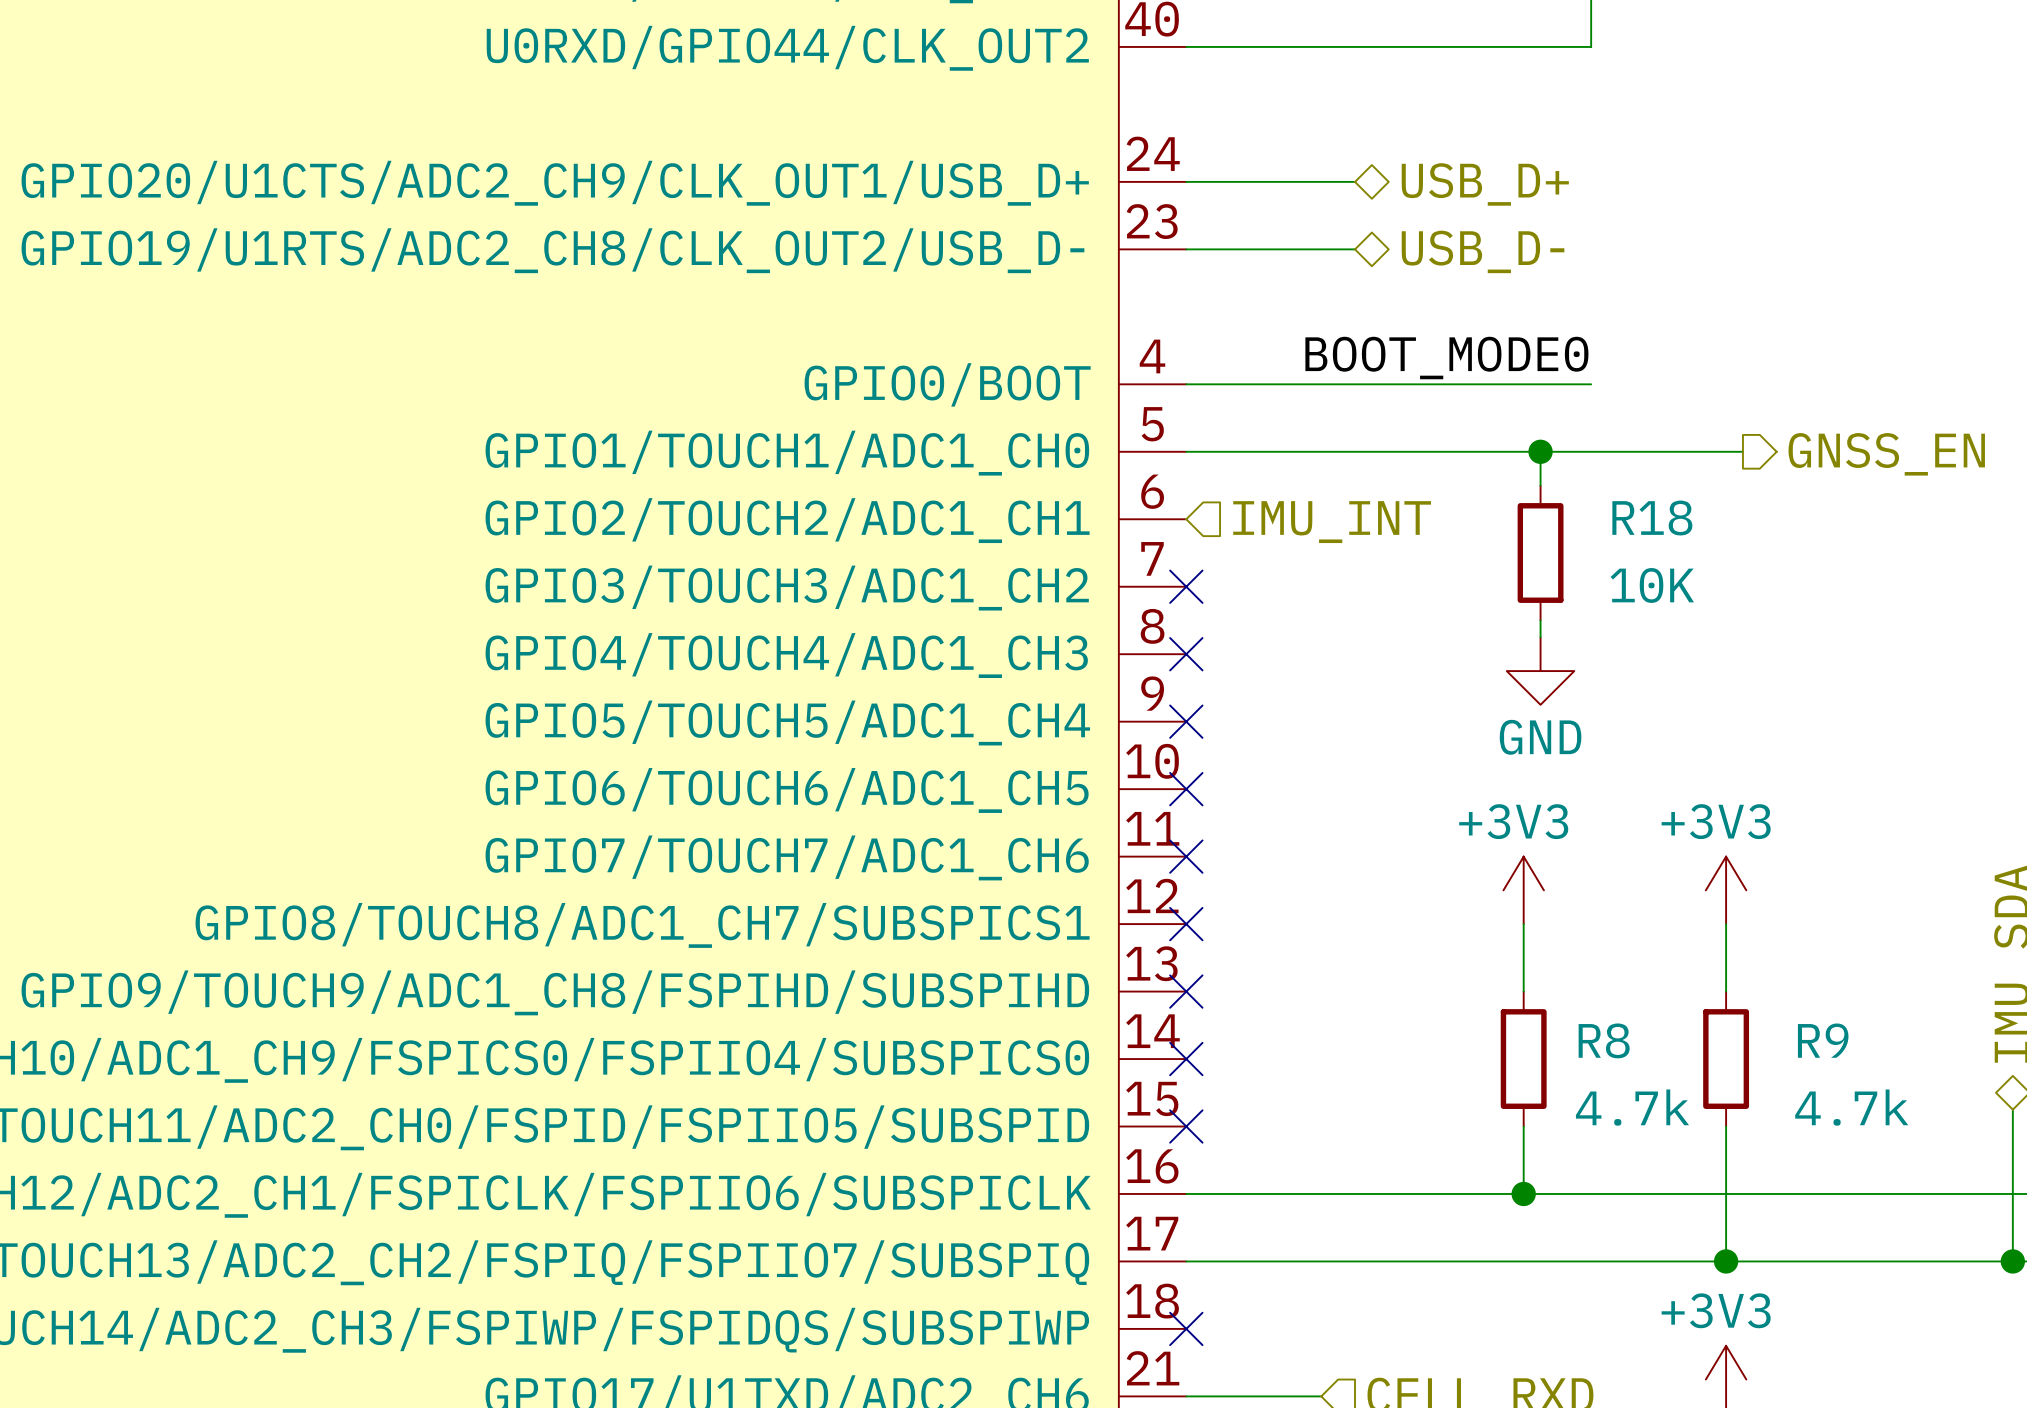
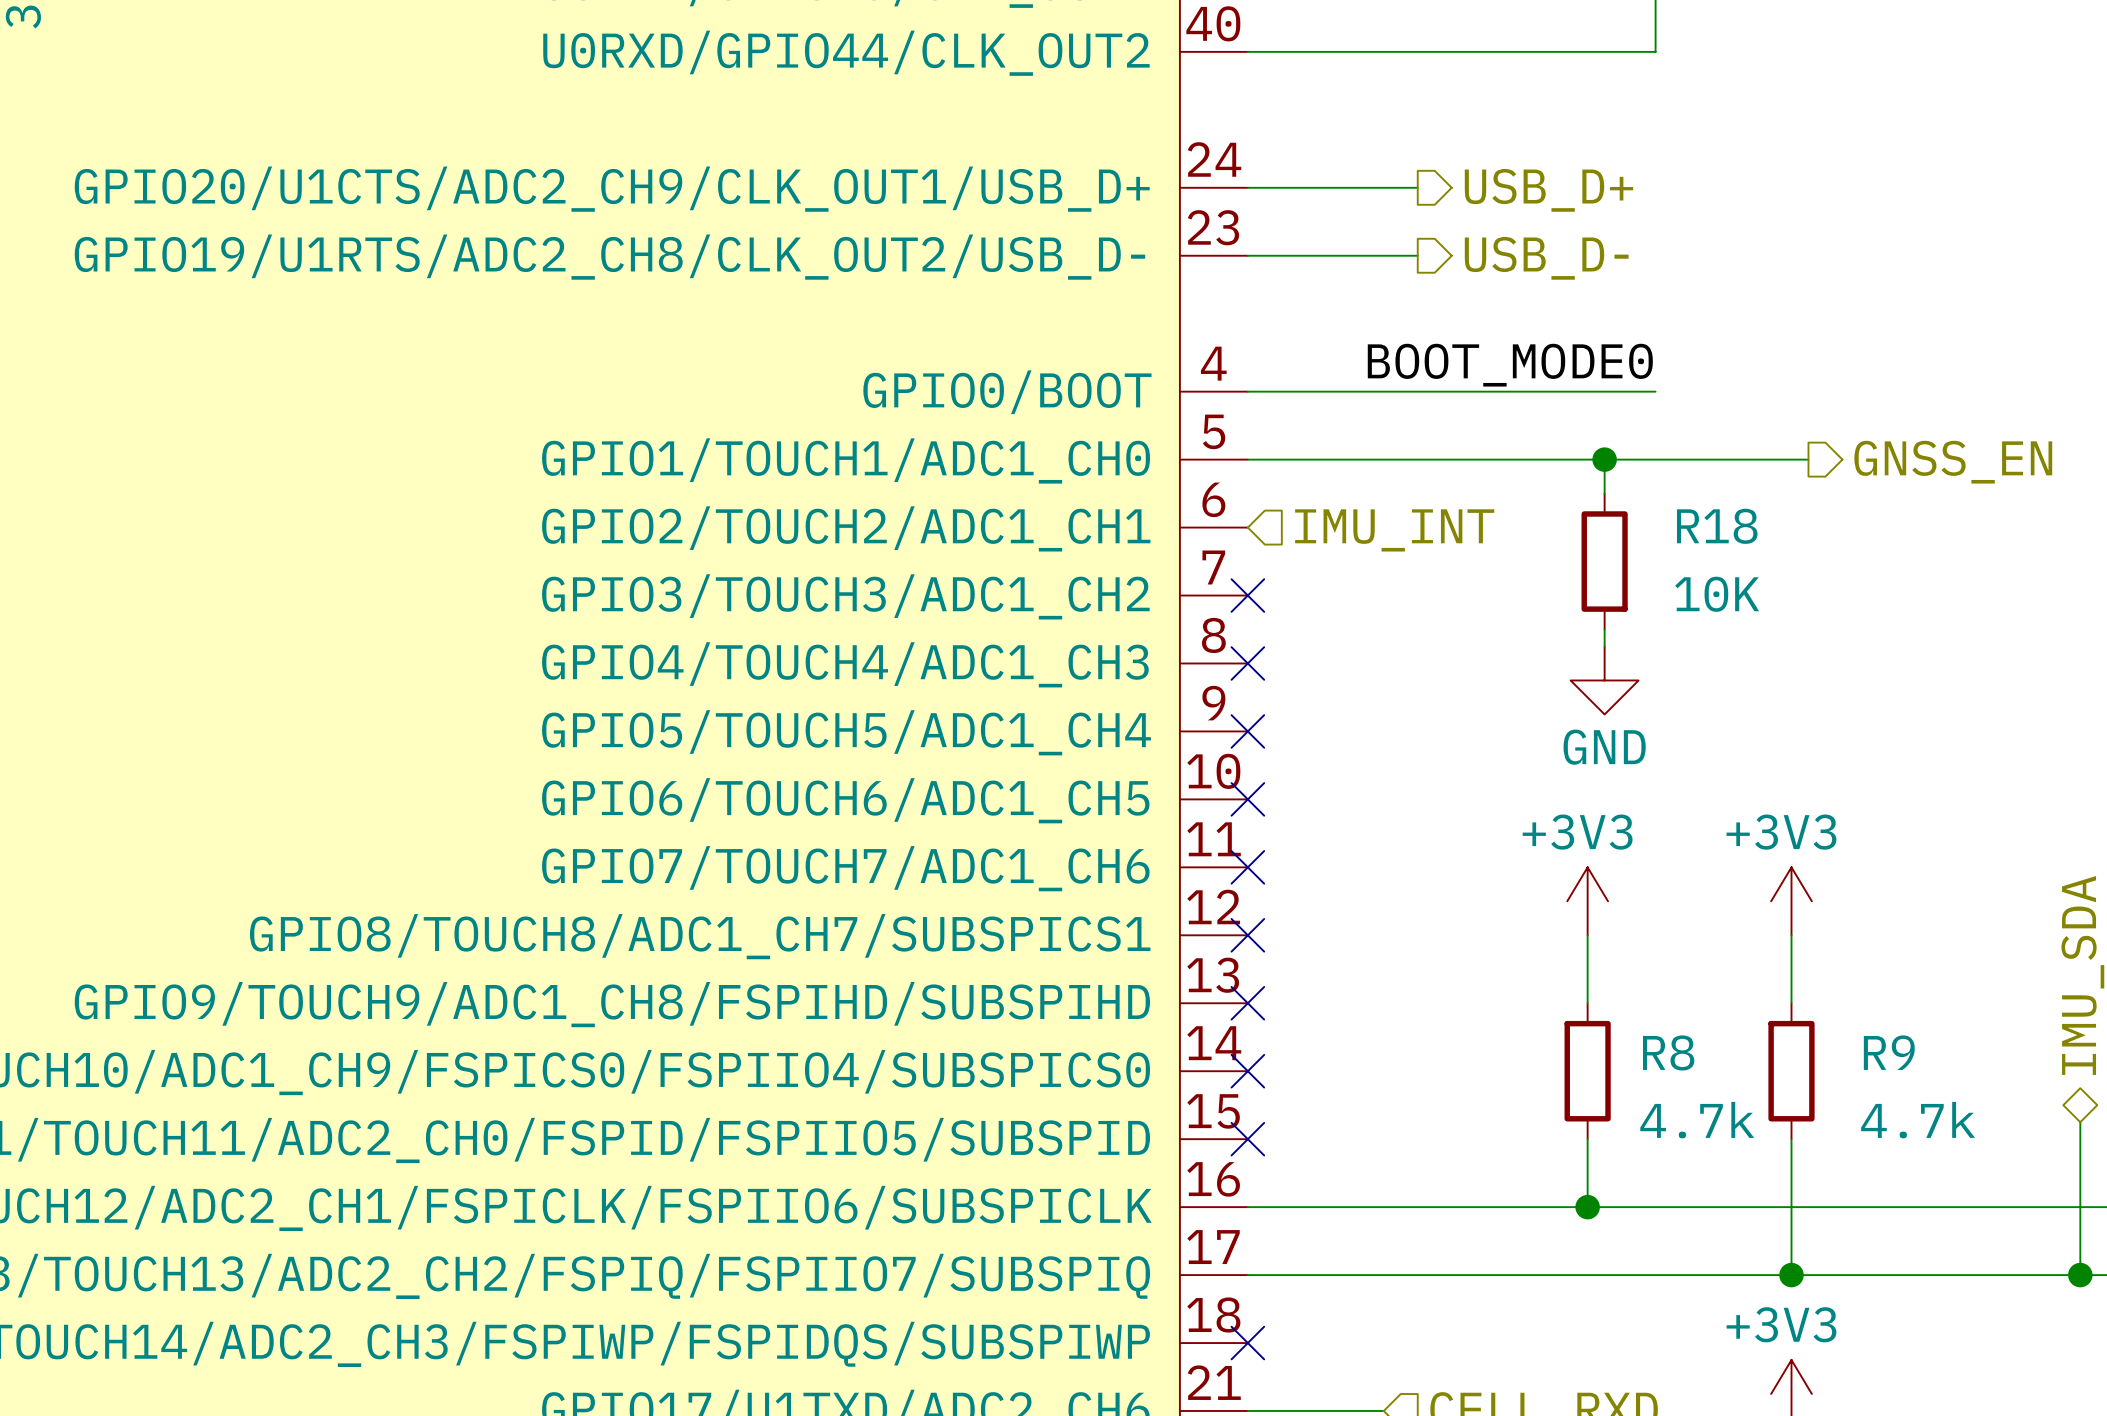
hierarchical label shape: bidirectional (1485, 184) -> output (1548, 190)
hierarchical label shape: bidirectional (1483, 251) -> output (1546, 258)

